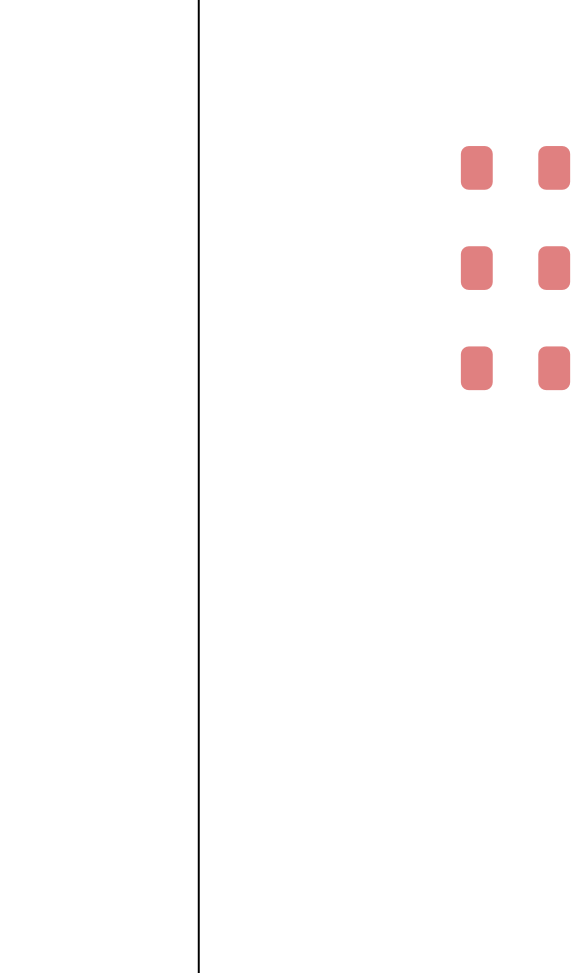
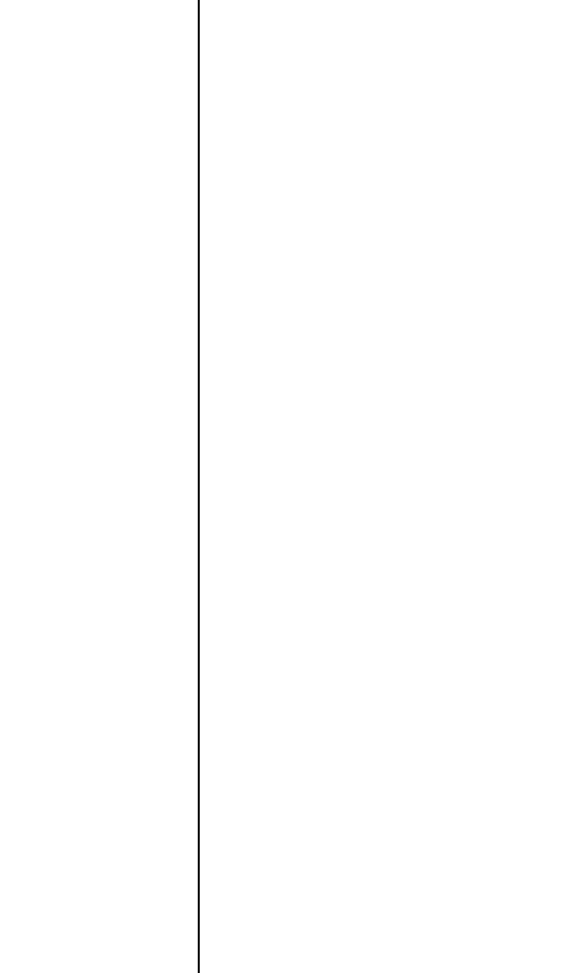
part: (515, 167) -> none
part: (515, 268) -> none
part: (515, 368) -> none

